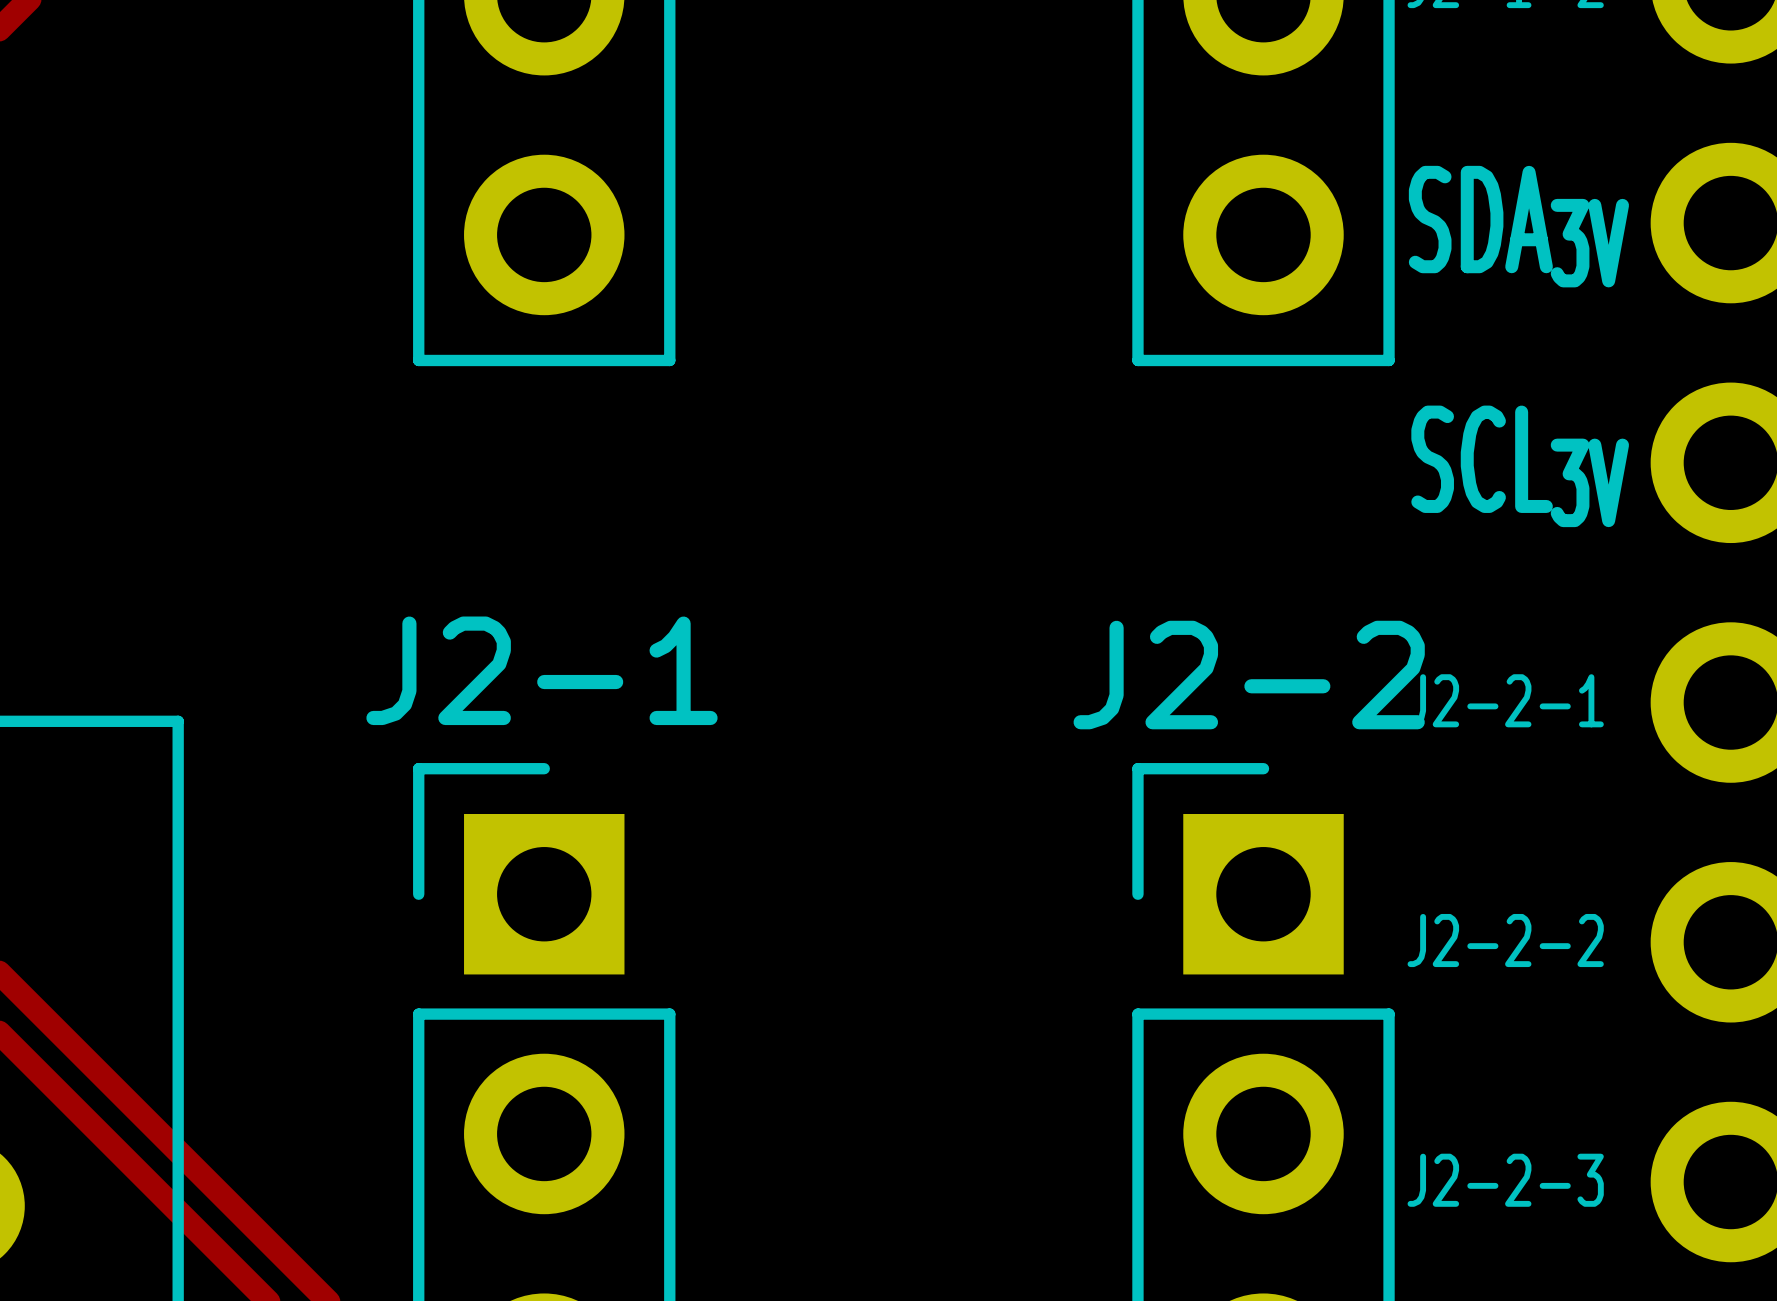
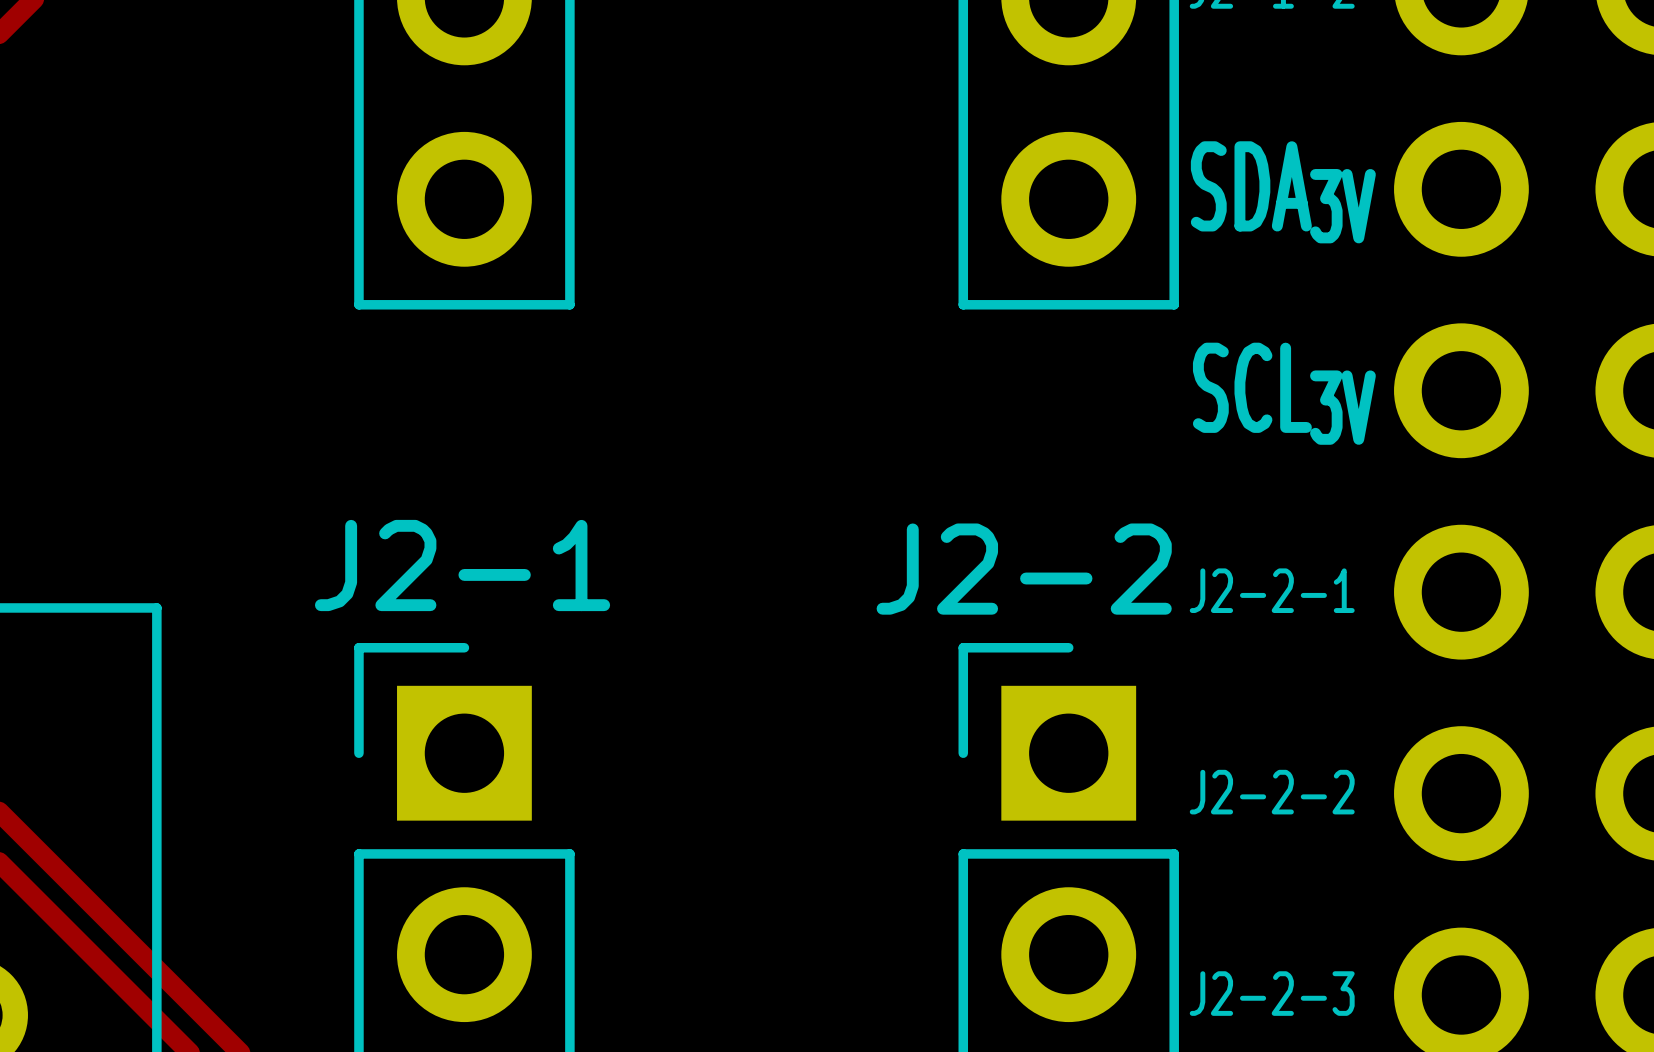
J2-2 name position: J2-2 (1249, 675) -> J2-2 (1024, 569)

